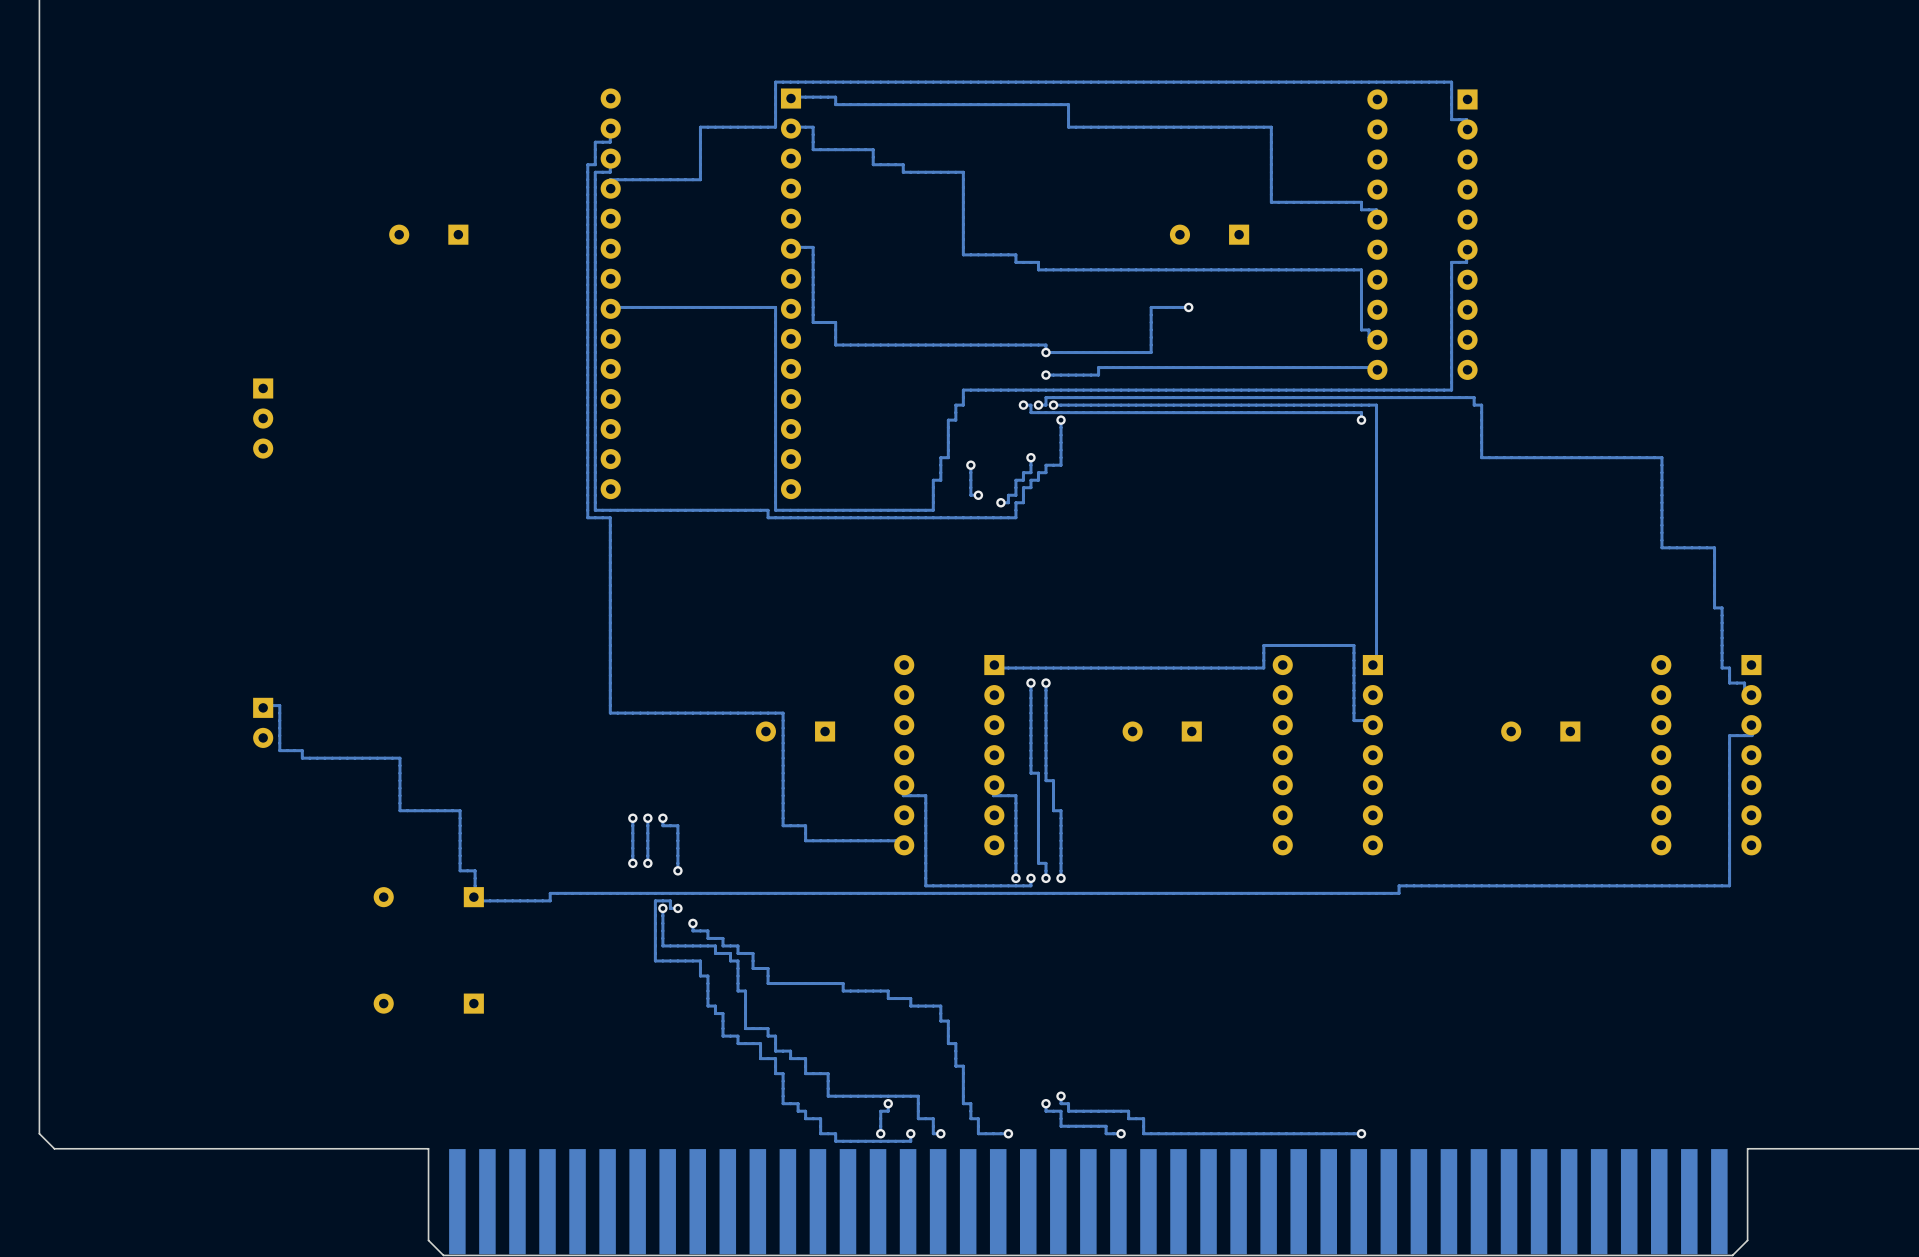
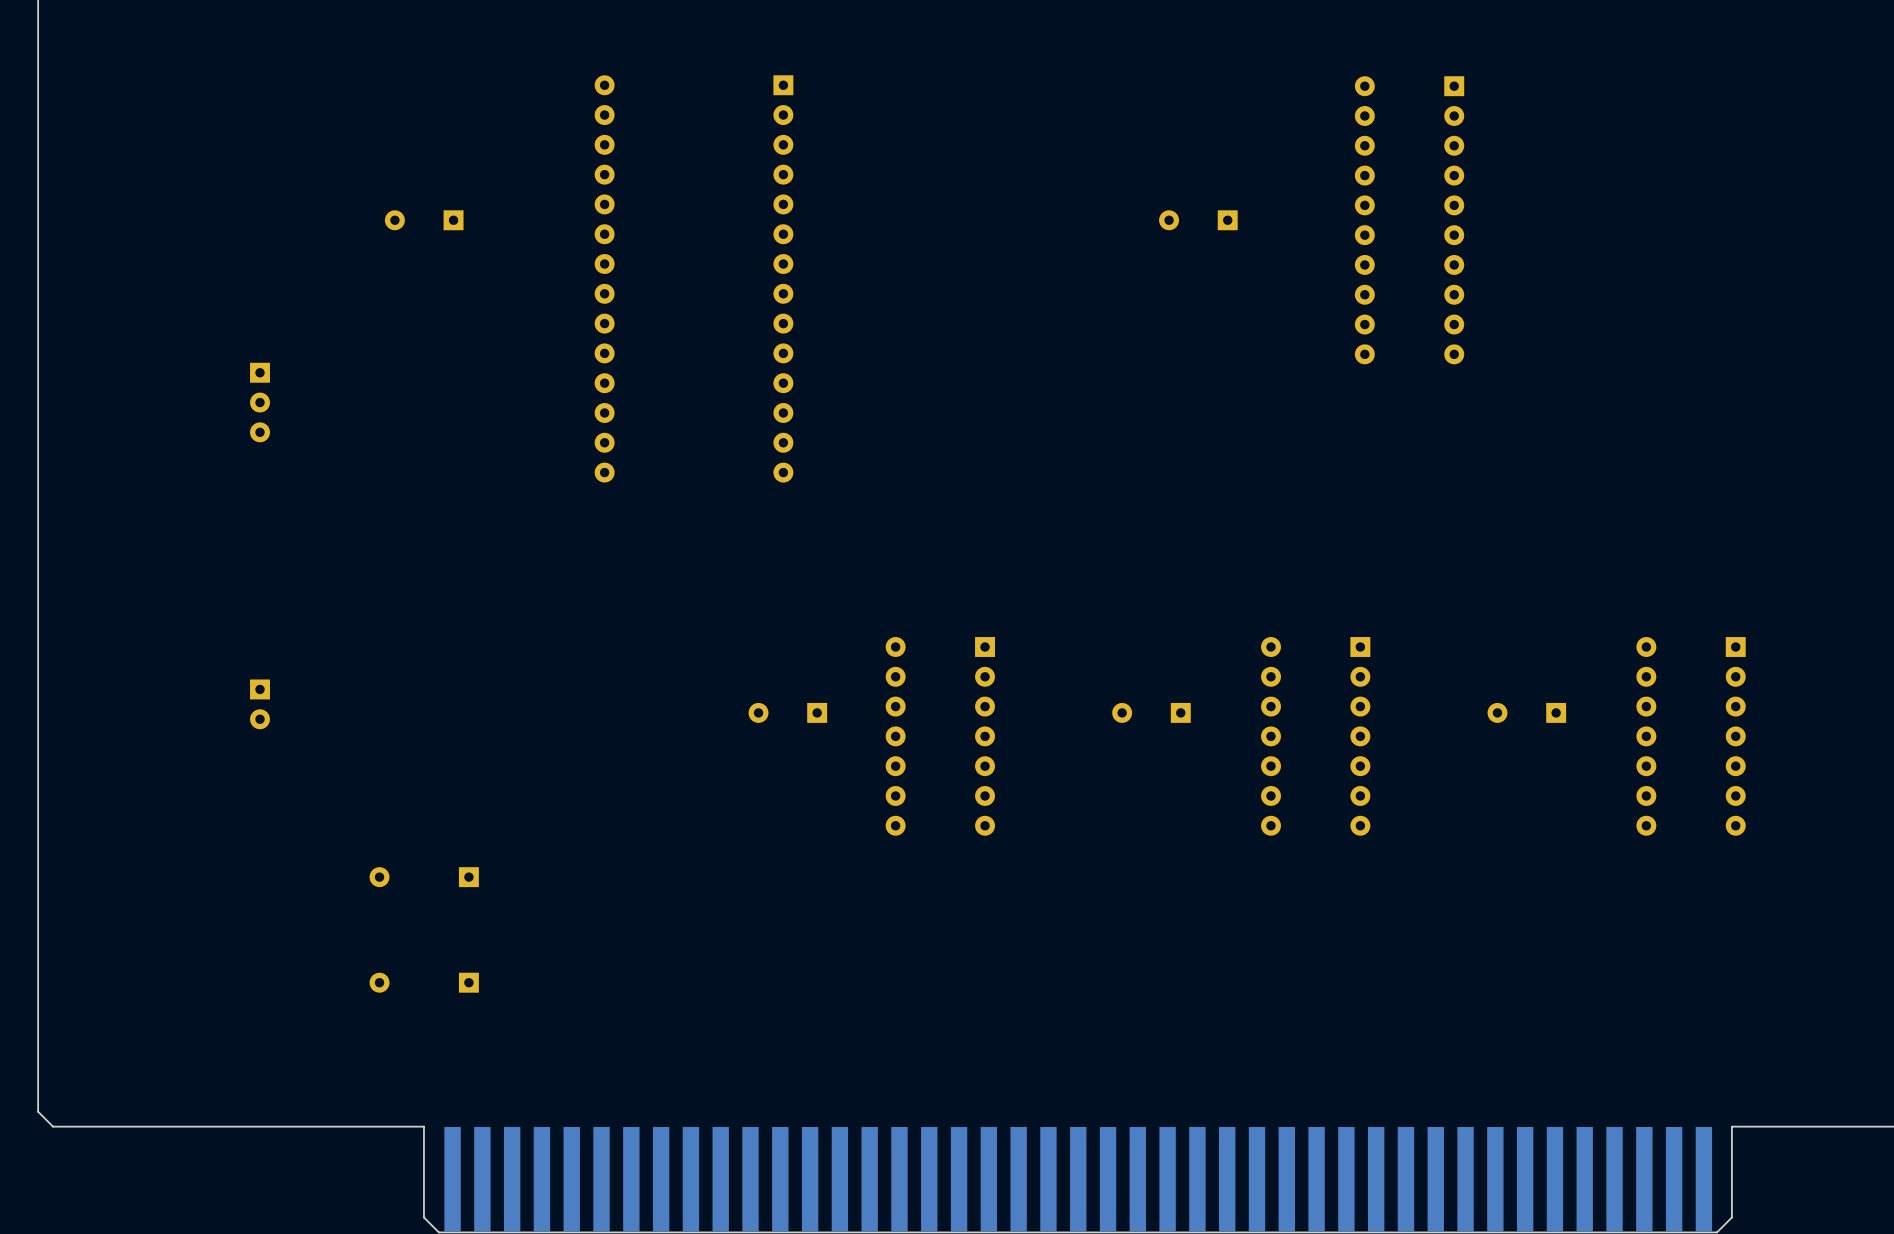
track: (791, 98) (835, 97) (835, 104) (1068, 104) (1068, 127) (1271, 127) (1271, 202) (1361, 202) (1361, 209) (1376, 209) (1376, 217) -> none
track: (610, 127) (610, 142) (595, 142) (595, 164) (587, 164) (587, 517) (610, 517) (610, 713) (783, 713) (783, 825) (805, 825) (805, 840) (903, 840) (903, 848) (904, 845) -> none
track: (1466, 127) (1466, 119) (1451, 119) (1451, 82) (775, 82) (775, 127) (700, 127) (700, 179) (610, 179) (610, 188) -> none
track: (791, 128) (813, 127) (813, 149) (873, 149) (873, 164) (903, 164) (903, 172) (963, 172) (963, 254) (1015, 254) (1015, 262) (1038, 262) (1038, 269) (1361, 269) (1361, 329) (1369, 329) (1369, 337) (1376, 337) -> none
track: (610, 158) (610, 172) (595, 172) (595, 510) (768, 510) (768, 517) (1015, 517) (1015, 502) (1023, 502) (1023, 487) (1030, 487) (1030, 480) (1038, 480) (1038, 472) (1045, 472) (1045, 465) (1061, 465) (1061, 420) -> none
track: (1466, 247) (1466, 262) (1451, 262) (1451, 390) (963, 390) (963, 405) (955, 405) (955, 420) (948, 420) (948, 457) (940, 457) (940, 480) (933, 480) (933, 510) (775, 510) (775, 307) (610, 308) -> none
track: (791, 248) (813, 247) (813, 322) (835, 322) (835, 345) (1045, 345) (1045, 352) (1151, 352) (1151, 307) (1188, 307) -> none
via: (1188, 307) -> none
via: (1045, 352) -> none
track: (1376, 367) (1098, 367) (1098, 375) (1045, 375) -> none
via: (1045, 375) -> none
track: (1023, 405) (1030, 405) (1030, 412) (1361, 412) (1361, 420) -> none
via: (1023, 405) -> none
track: (1038, 405) (1045, 405) (1045, 397) (1474, 397) (1474, 405) (1481, 405) (1481, 457) (1661, 457) (1661, 547) (1714, 547) (1714, 607) (1722, 607) (1722, 668) (1729, 668) (1729, 683) (1744, 683) (1744, 690) (1752, 690) (1752, 698) (1751, 695) -> none
via: (1038, 405) -> none
track: (1053, 405) (1376, 405) (1376, 668) (1372, 665) -> none
via: (1053, 405) -> none
via: (1061, 420) -> none
via: (1361, 420) -> none
track: (1030, 457) (1030, 472) (1023, 472) (1023, 480) (1015, 480) (1015, 495) (1008, 495) (1008, 502) (1000, 502) -> none
via: (1030, 457) -> none
track: (970, 465) (970, 495) (978, 495) -> none
via: (970, 465) -> none
via: (978, 495) -> none
via: (1000, 502) -> none
track: (994, 665) (993, 668) (1263, 668) (1263, 645) (1353, 645) (1353, 720) (1376, 720) (1376, 728) -> none
track: (1030, 683) (1030, 773) (1038, 773) (1038, 863) (1045, 863) (1045, 878) -> none
via: (1030, 683) -> none
track: (1045, 683) (1045, 780) (1053, 780) (1053, 810) (1061, 810) (1061, 878) -> none
via: (1045, 683) -> none
track: (263, 707) (264, 705) (279, 705) (279, 750) (302, 750) (302, 758) (399, 758) (399, 810) (460, 810) (460, 870) (475, 870) (475, 900) -> none
track: (1752, 728) (1752, 735) (1729, 735) (1729, 885) (1399, 885) (1399, 893) (550, 893) (550, 900) (475, 900) -> none
track: (904, 785) (903, 795) (925, 795) (925, 885) (1030, 885) (1030, 878) -> none
track: (994, 785) (993, 795) (1015, 795) (1015, 878) -> none
track: (632, 818) (632, 863) -> none
via: (632, 818) -> none
track: (647, 818) (647, 863) -> none
via: (647, 818) -> none
track: (662, 818) (662, 825) (677, 825) (677, 870) -> none
via: (662, 818) -> none
via: (632, 863) -> none
via: (647, 863) -> none
via: (677, 870) -> none
via: (1015, 878) -> none
via: (1030, 878) -> none
via: (1045, 878) -> none
via: (1061, 878) -> none
track: (662, 908) (662, 945) (715, 945) (715, 953) (730, 953) (730, 960) (738, 960) (738, 991) (745, 991) (745, 1028) (768, 1028) (768, 1036) (775, 1036) (775, 1051) (790, 1051) (790, 1058) (805, 1058) (805, 1073) (828, 1073) (828, 1096) (918, 1096) (918, 1118) (933, 1118) (933, 1133) (940, 1133) -> none
via: (662, 908) -> none
track: (677, 908) (670, 908) (670, 900) (655, 900) (655, 960) (700, 960) (700, 976) (707, 976) (707, 1006) (715, 1006) (715, 1013) (722, 1013) (722, 1036) (738, 1036) (738, 1043) (760, 1043) (760, 1058) (775, 1058) (775, 1073) (783, 1073) (783, 1103) (798, 1103) (798, 1111) (805, 1111) (805, 1118) (820, 1118) (820, 1133) (835, 1133) (835, 1141) (910, 1141) (910, 1133) -> none
via: (677, 908) -> none
track: (692, 923) (692, 930) (707, 930) (707, 938) (722, 938) (722, 945) (738, 945) (738, 953) (753, 953) (753, 968) (768, 968) (768, 983) (843, 983) (843, 991) (888, 991) (888, 998) (910, 998) (910, 1006) (940, 1006) (940, 1021) (948, 1021) (948, 1043) (955, 1043) (955, 1066) (963, 1066) (963, 1103) (970, 1103) (970, 1118) (978, 1118) (978, 1133) (1008, 1133) -> none
via: (692, 923) -> none
track: (1061, 1096) (1061, 1103) (1068, 1103) (1068, 1111) (1128, 1111) (1128, 1118) (1143, 1118) (1143, 1133) (1361, 1133) -> none
via: (1061, 1096) -> none
track: (888, 1103) (888, 1111) (880, 1111) (880, 1133) -> none
via: (888, 1103) -> none
track: (1045, 1103) (1045, 1111) (1061, 1111) (1061, 1126) (1106, 1126) (1106, 1133) (1121, 1133) -> none
via: (1045, 1103) -> none
via: (880, 1133) -> none
via: (910, 1133) -> none
via: (940, 1133) -> none
via: (1008, 1133) -> none
via: (1121, 1133) -> none
via: (1361, 1133) -> none

